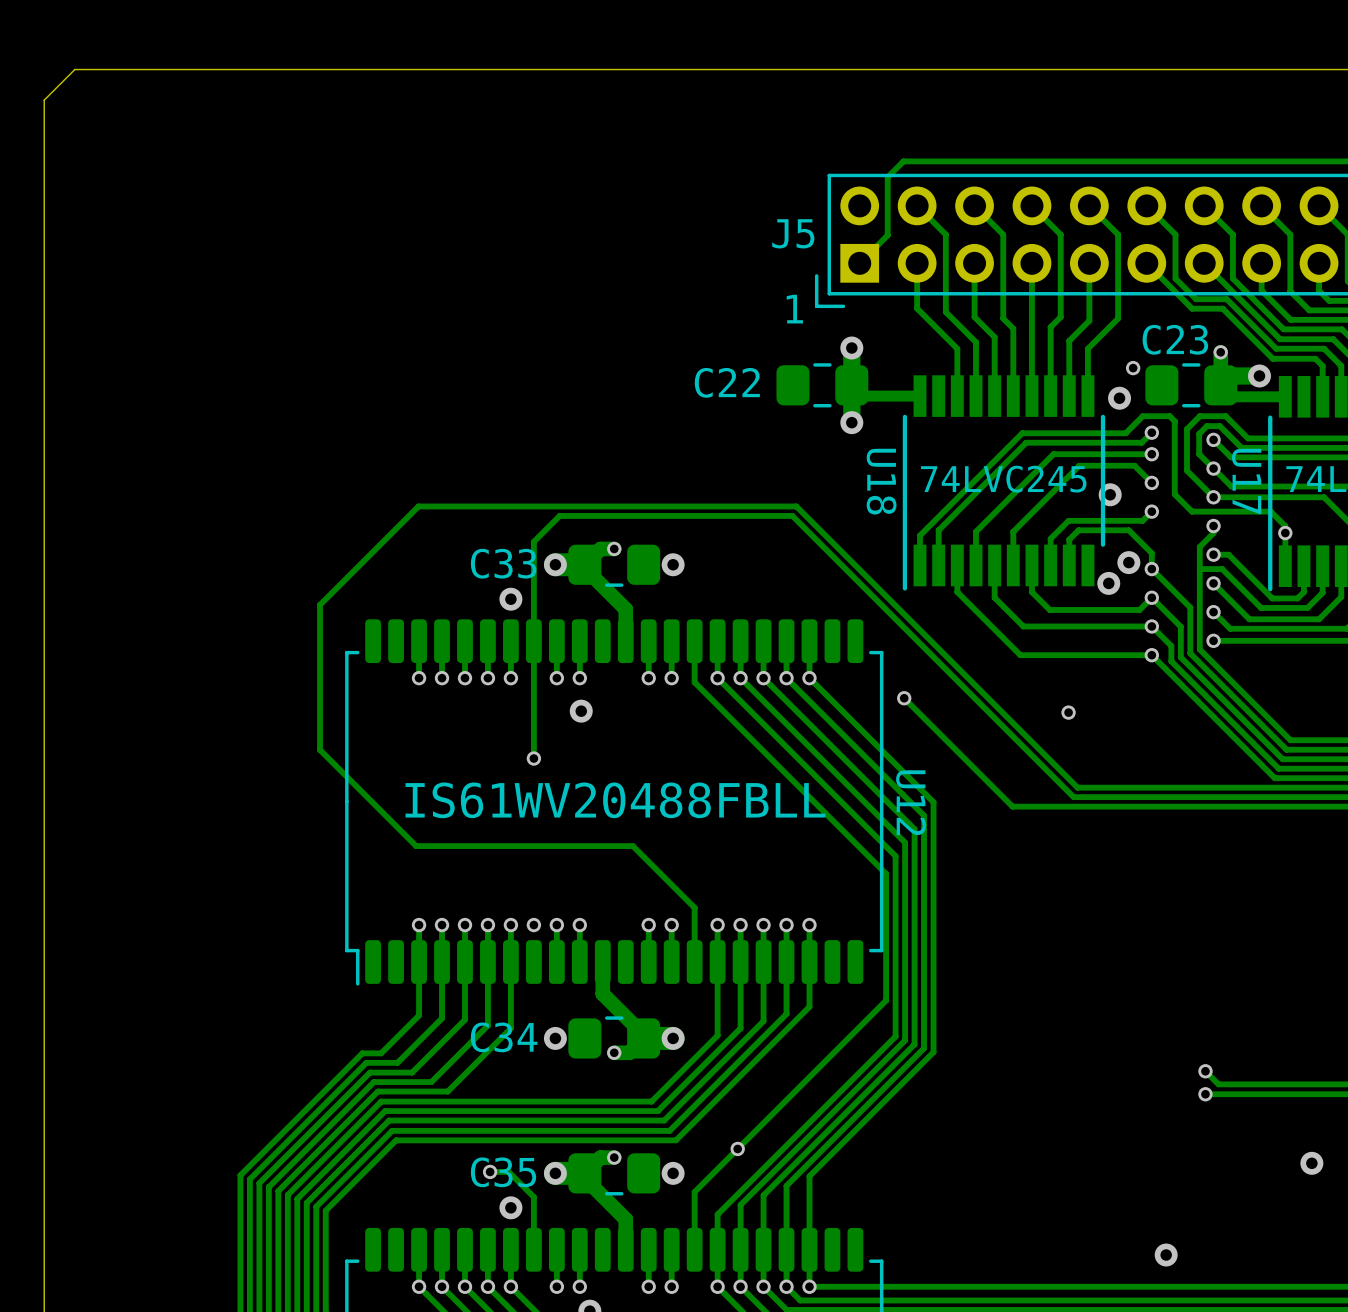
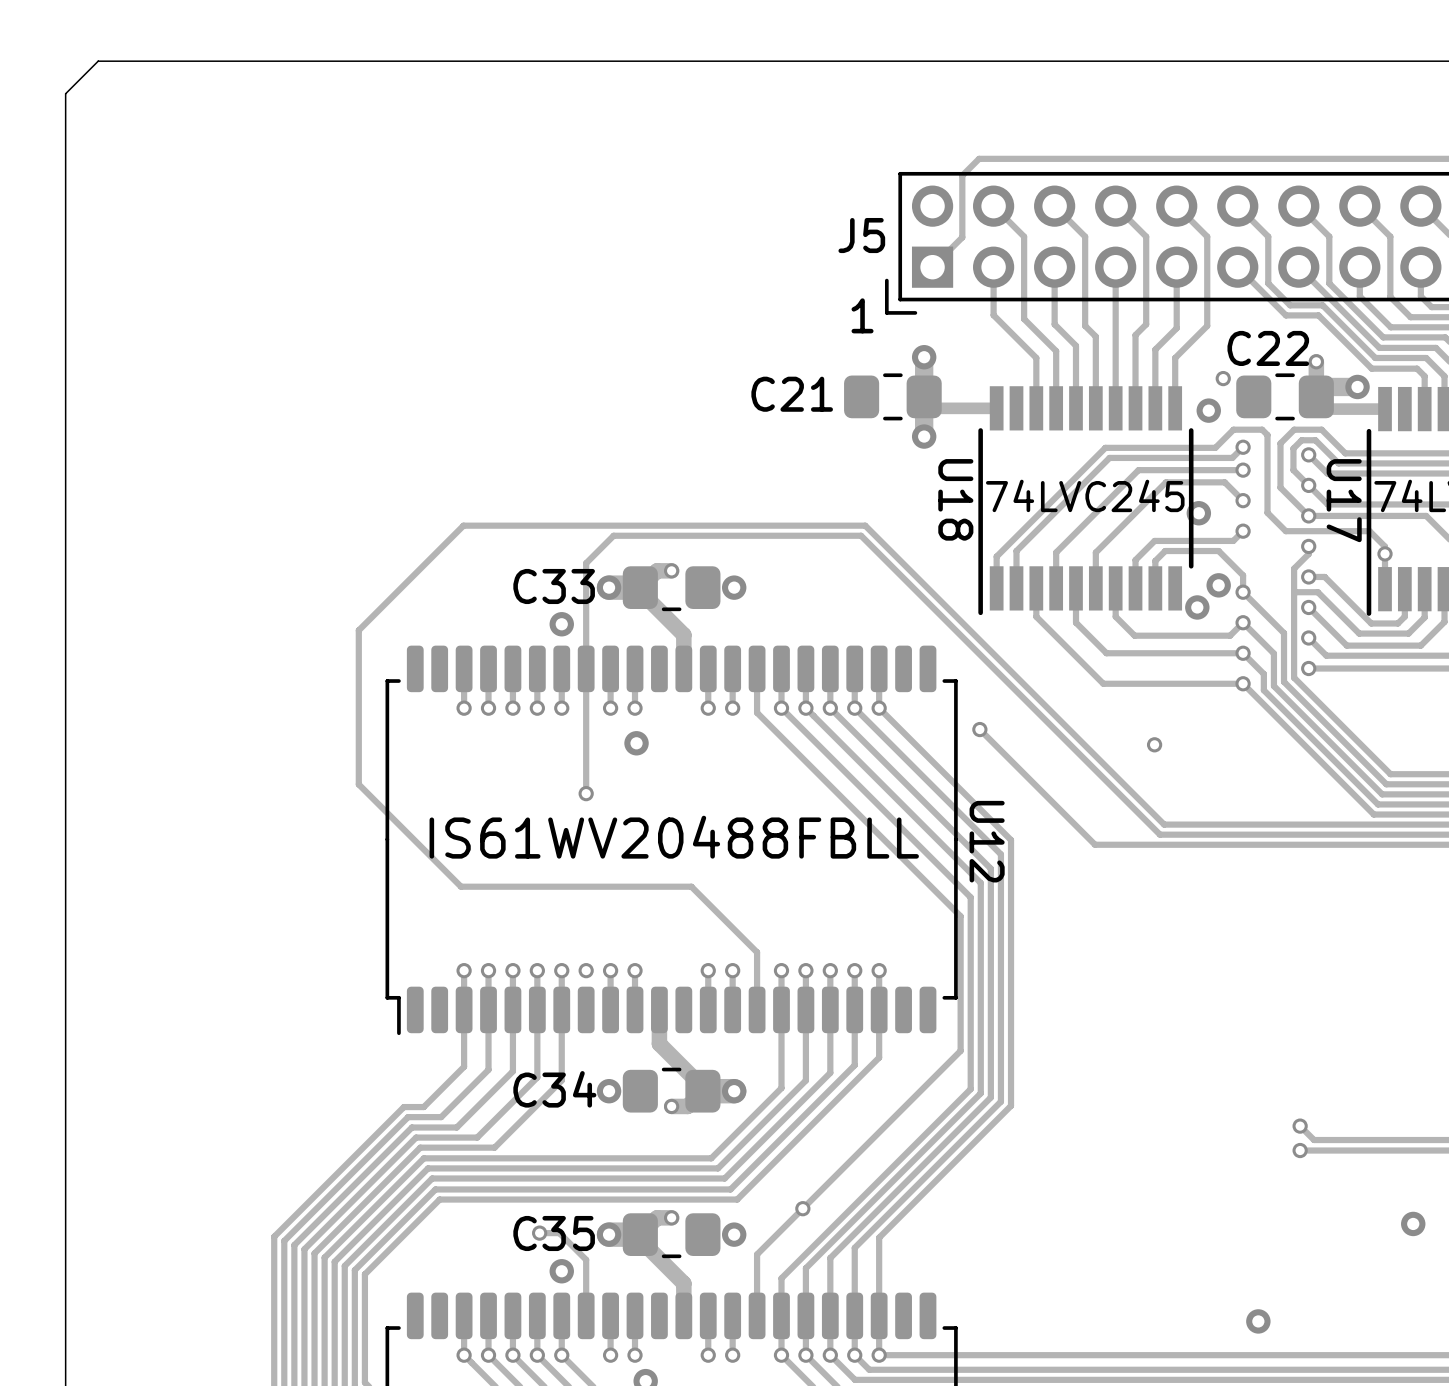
C23 name: C23 (1175, 339) -> C22 (1268, 348)
C22 name: C22 (727, 382) -> C21 (792, 394)

